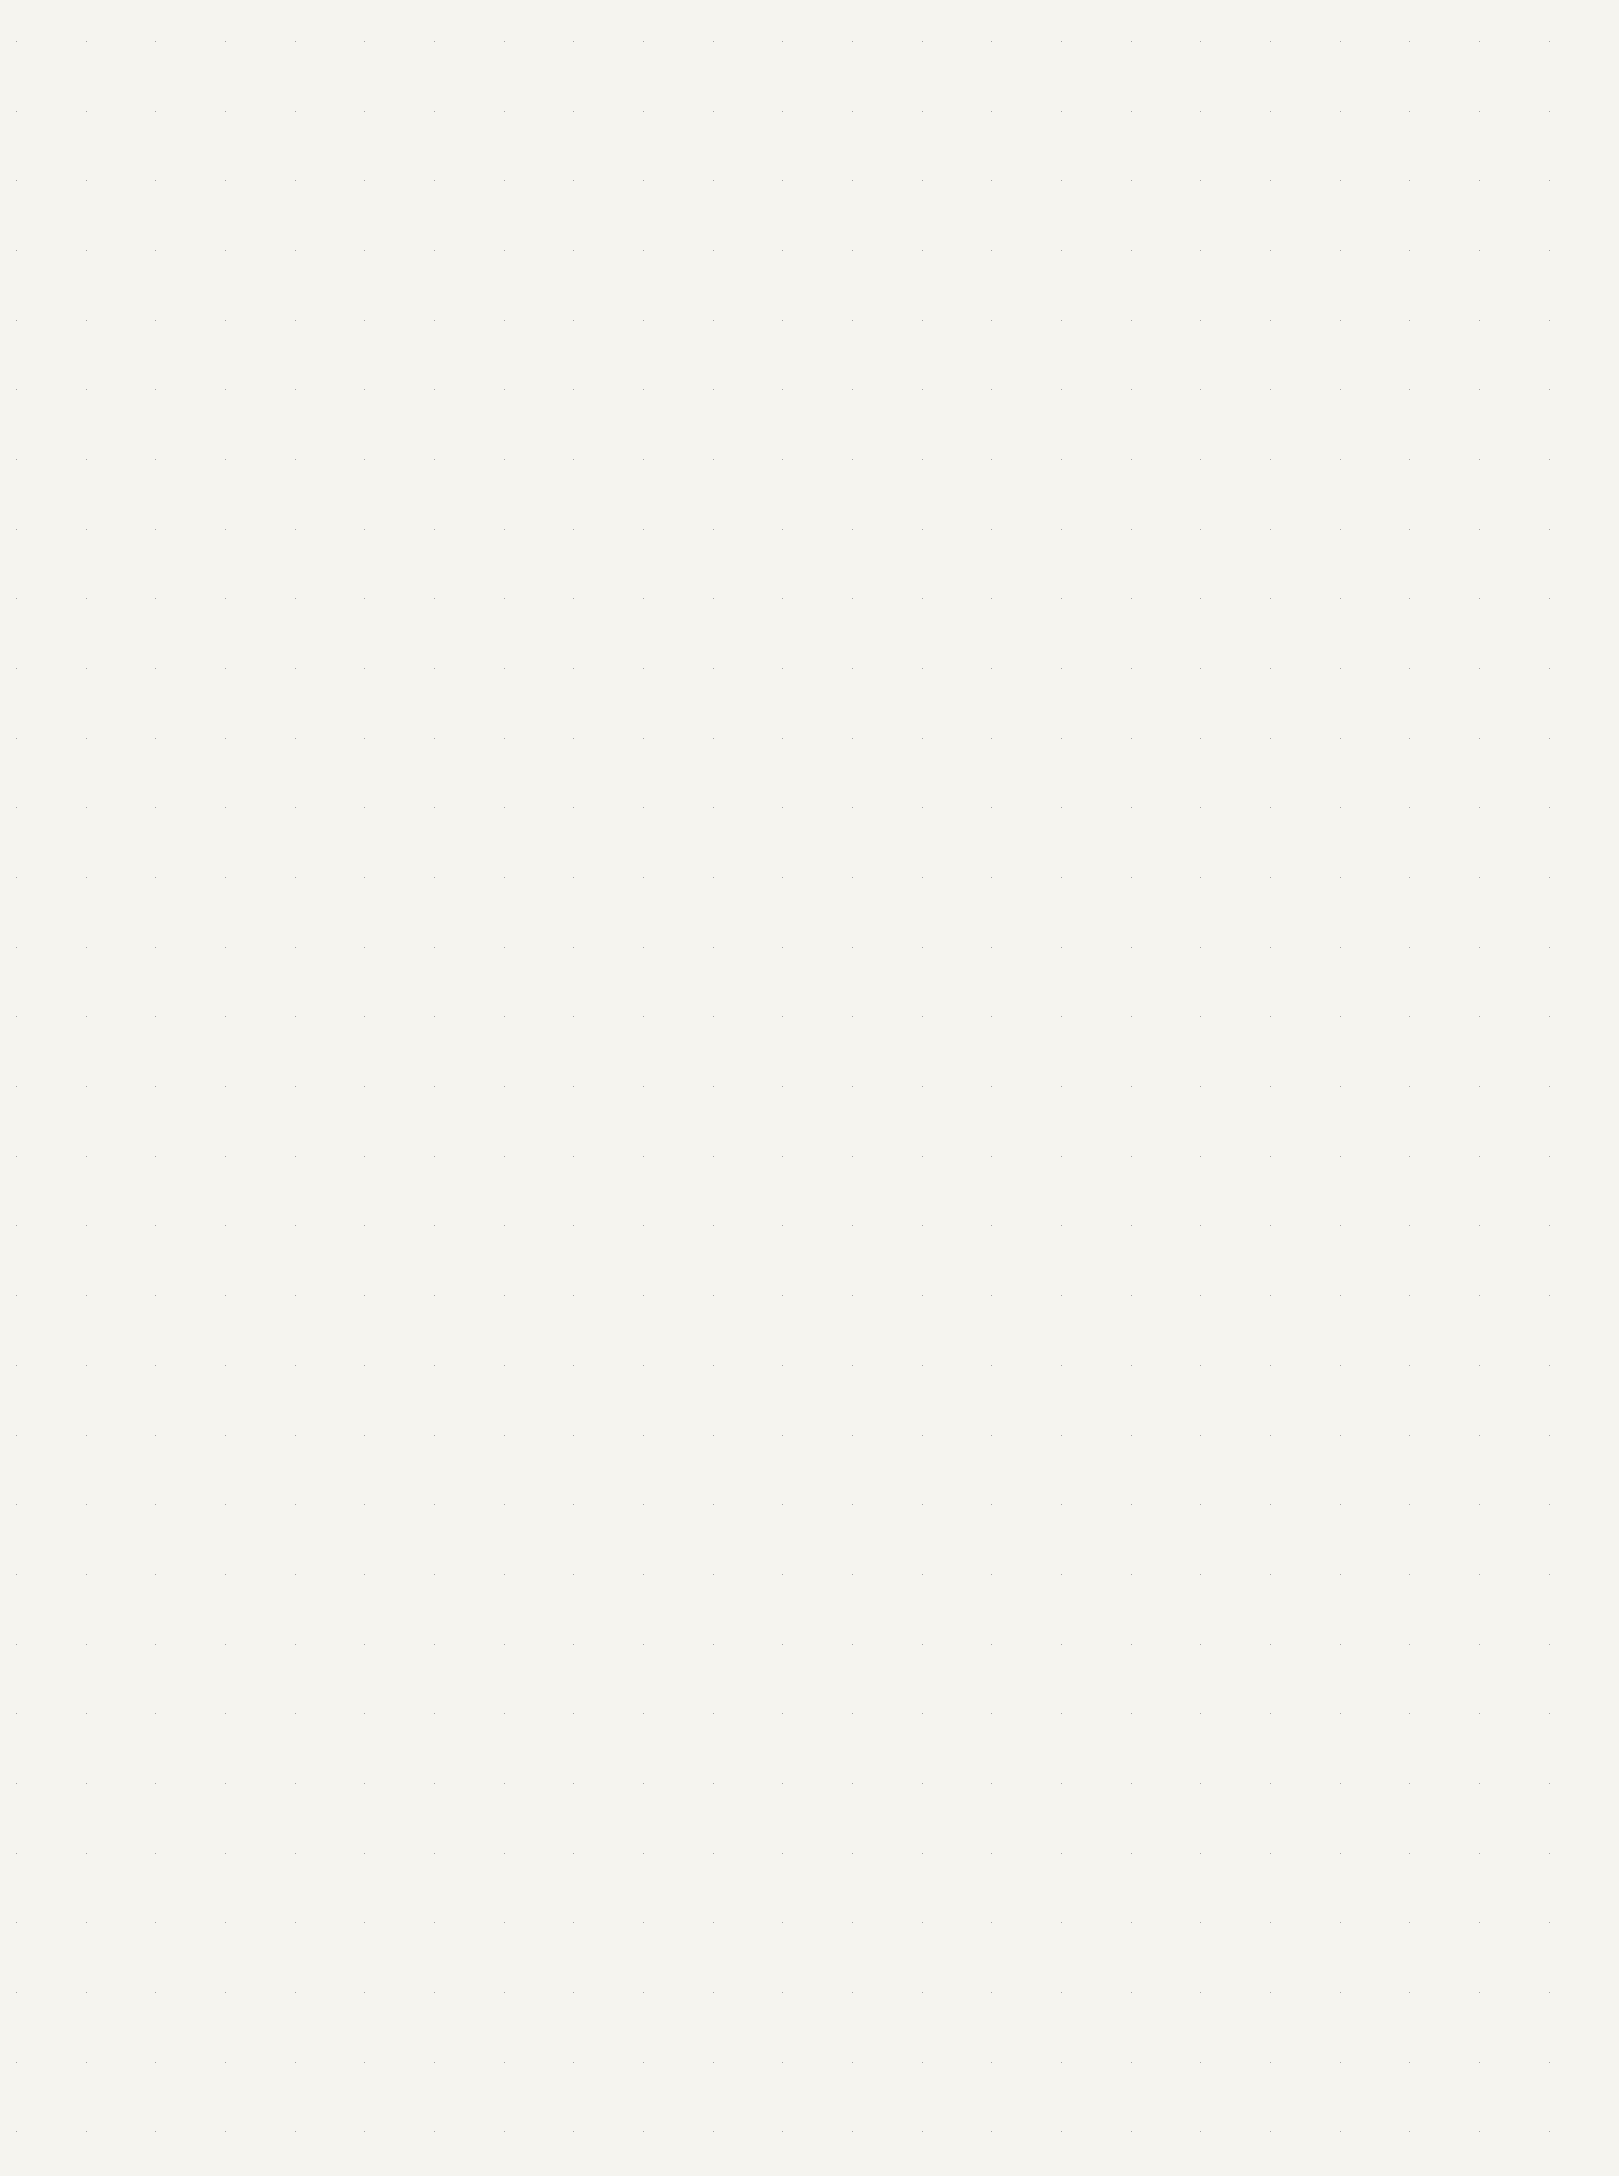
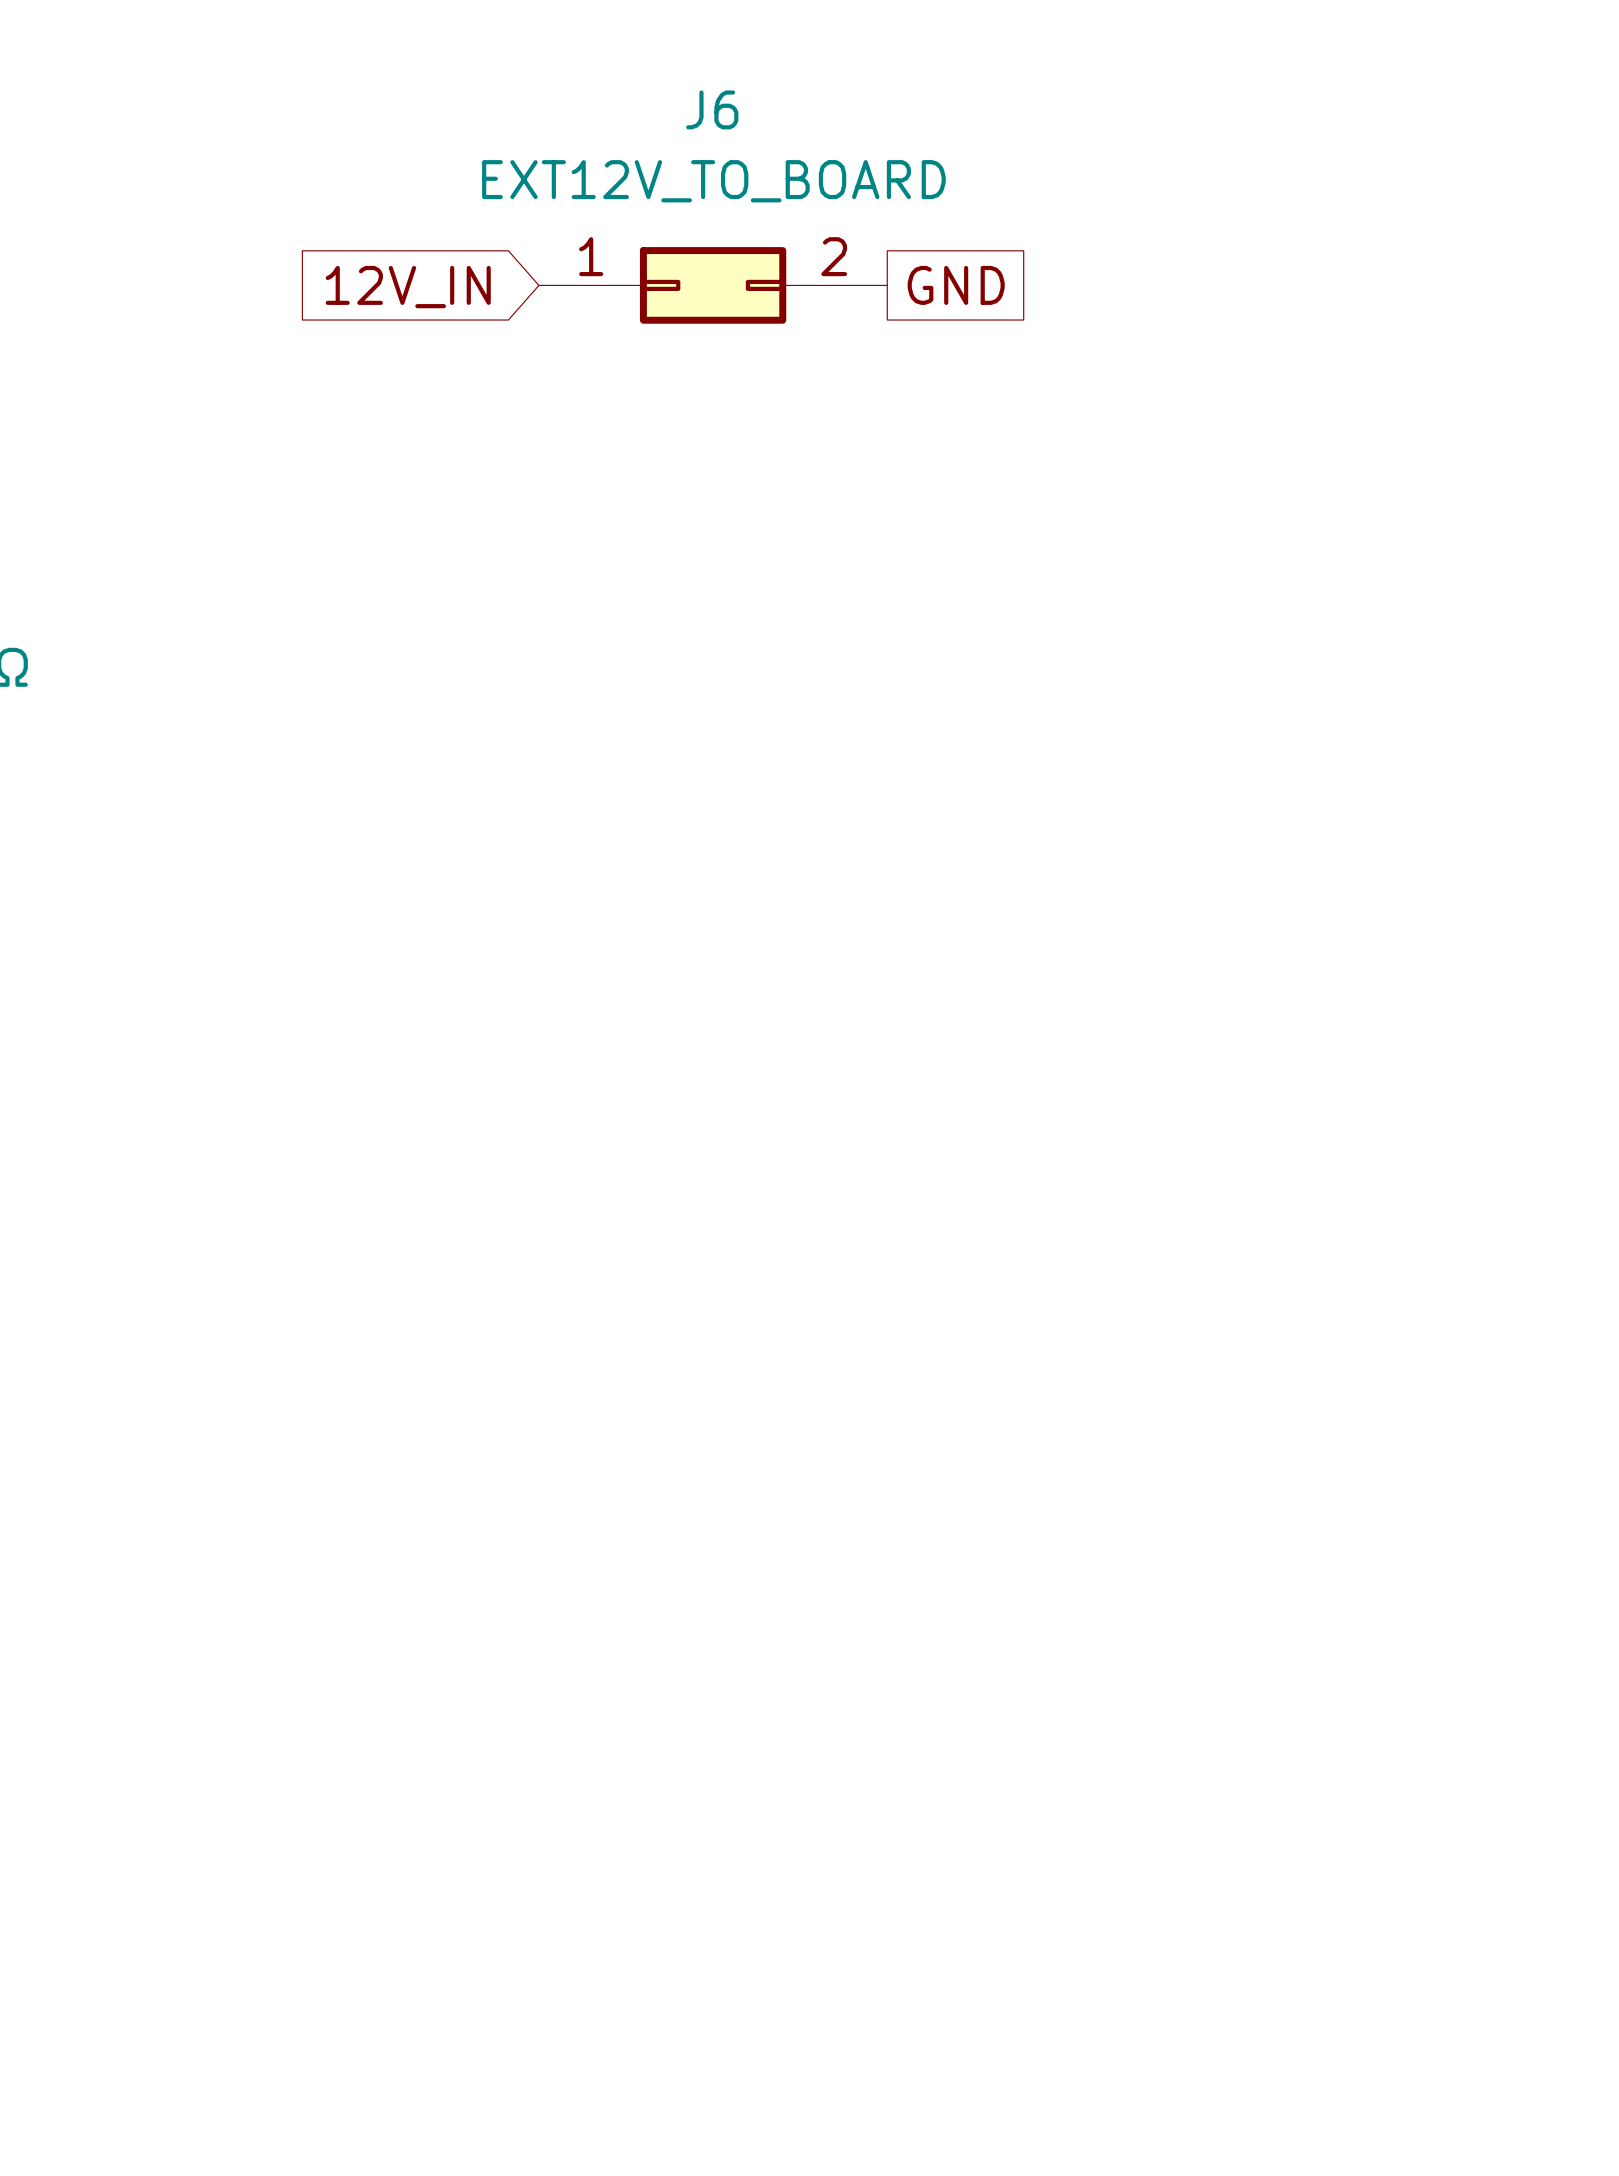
J6: none -> EXT12V_TO_BOARD (713, 285)
global label: none -> GND (956, 285)
global label: none -> 12V_IN (408, 287)

